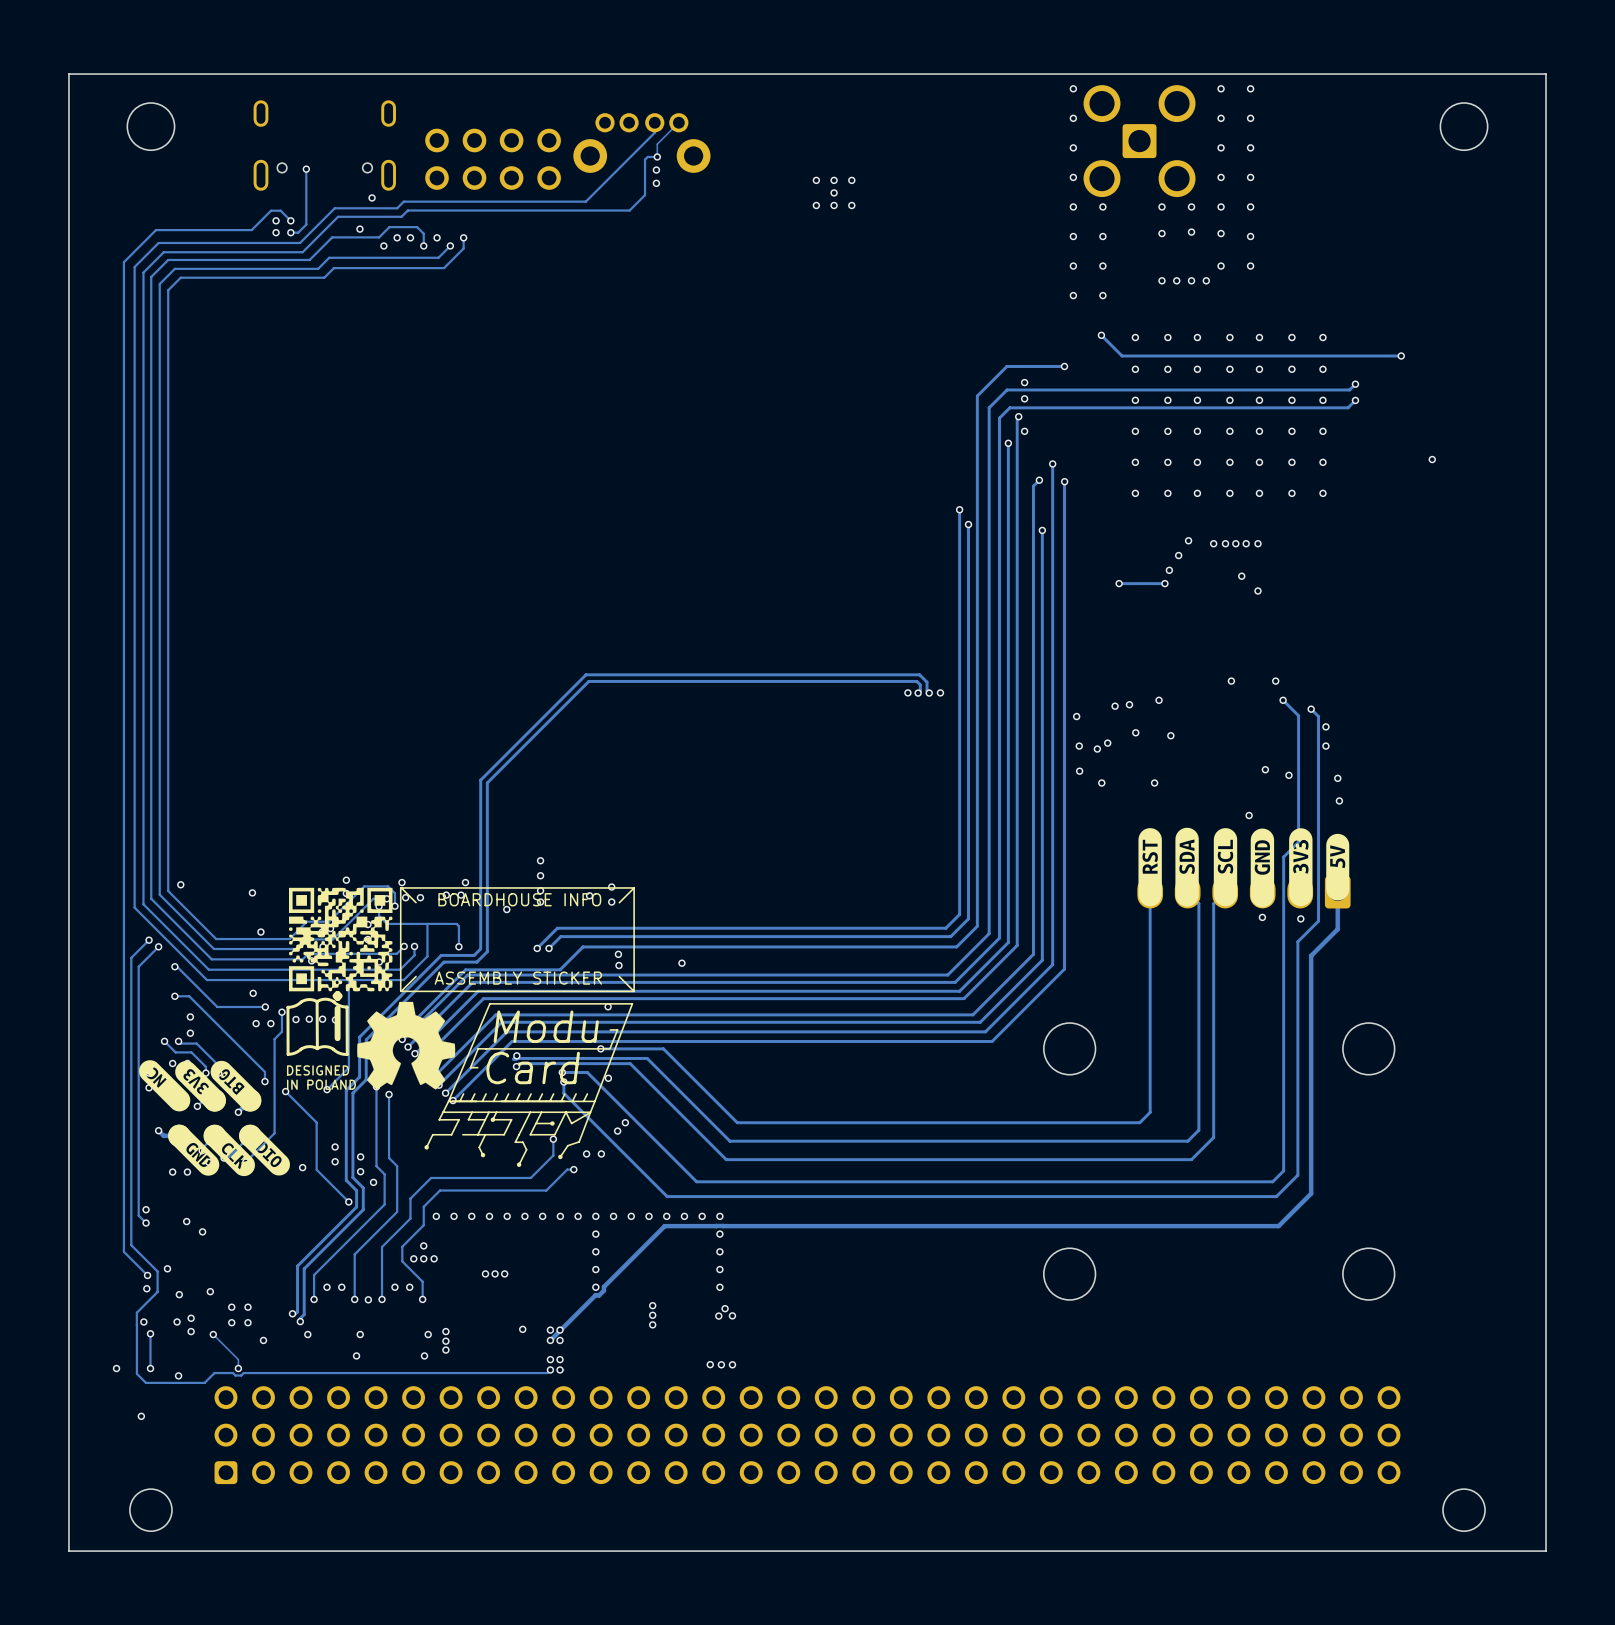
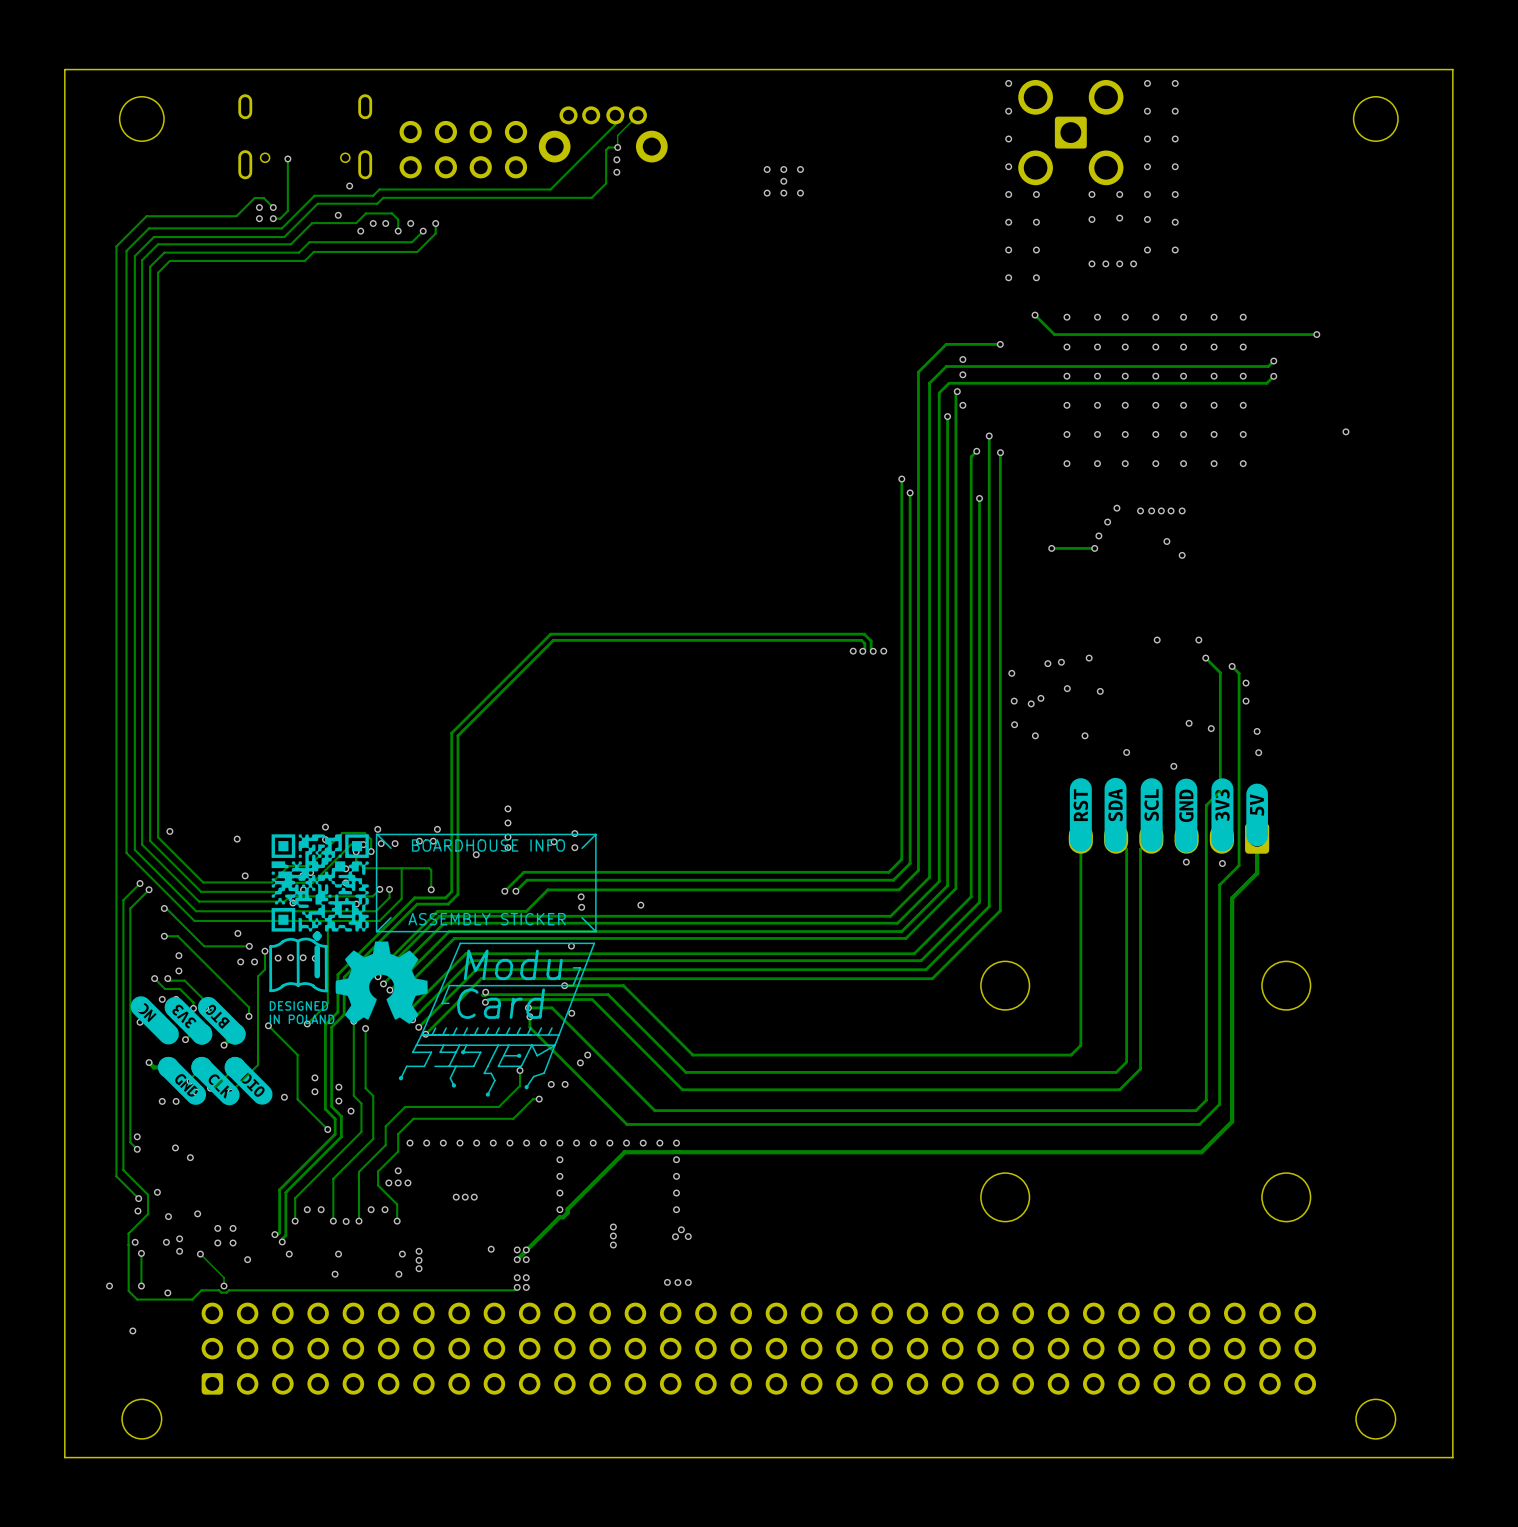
via: none -> (1126, 752)

